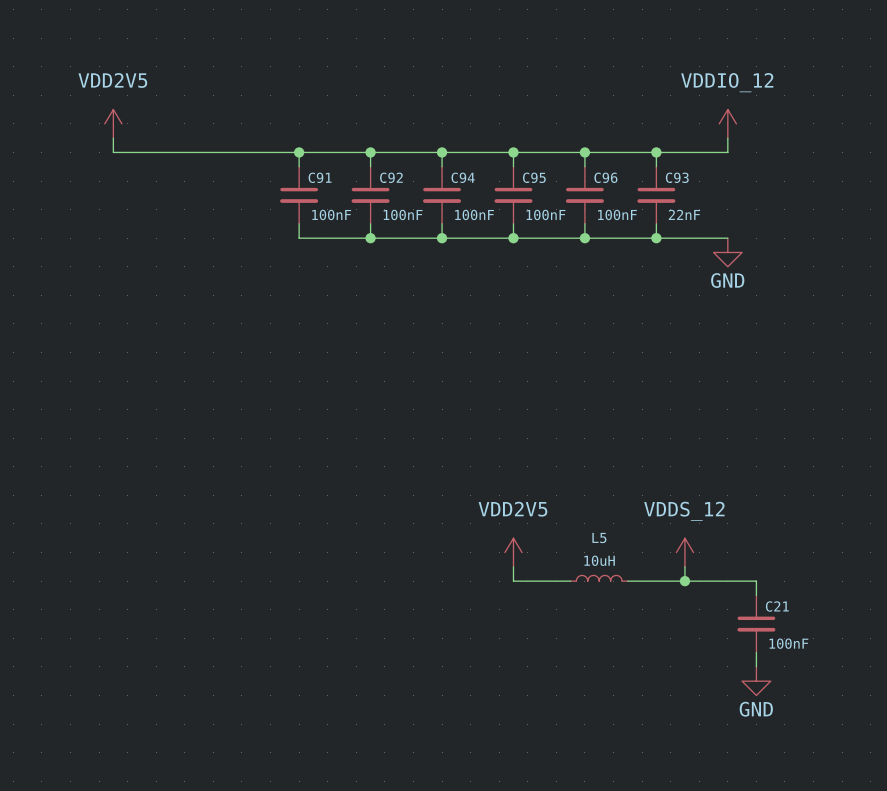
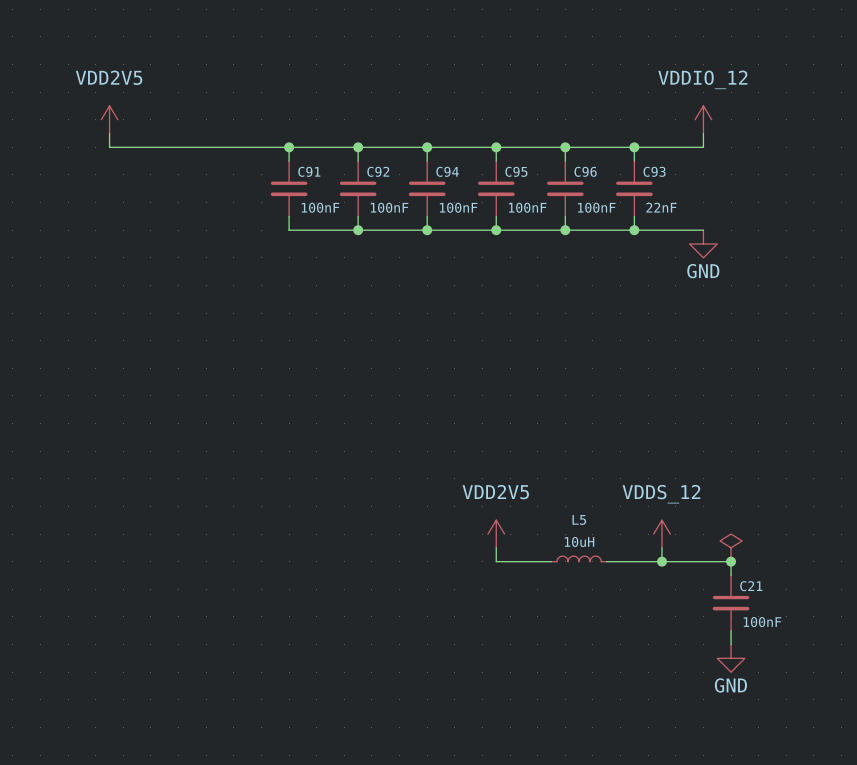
power symbol: none -> (731, 547)
junction: none -> (731, 561)

